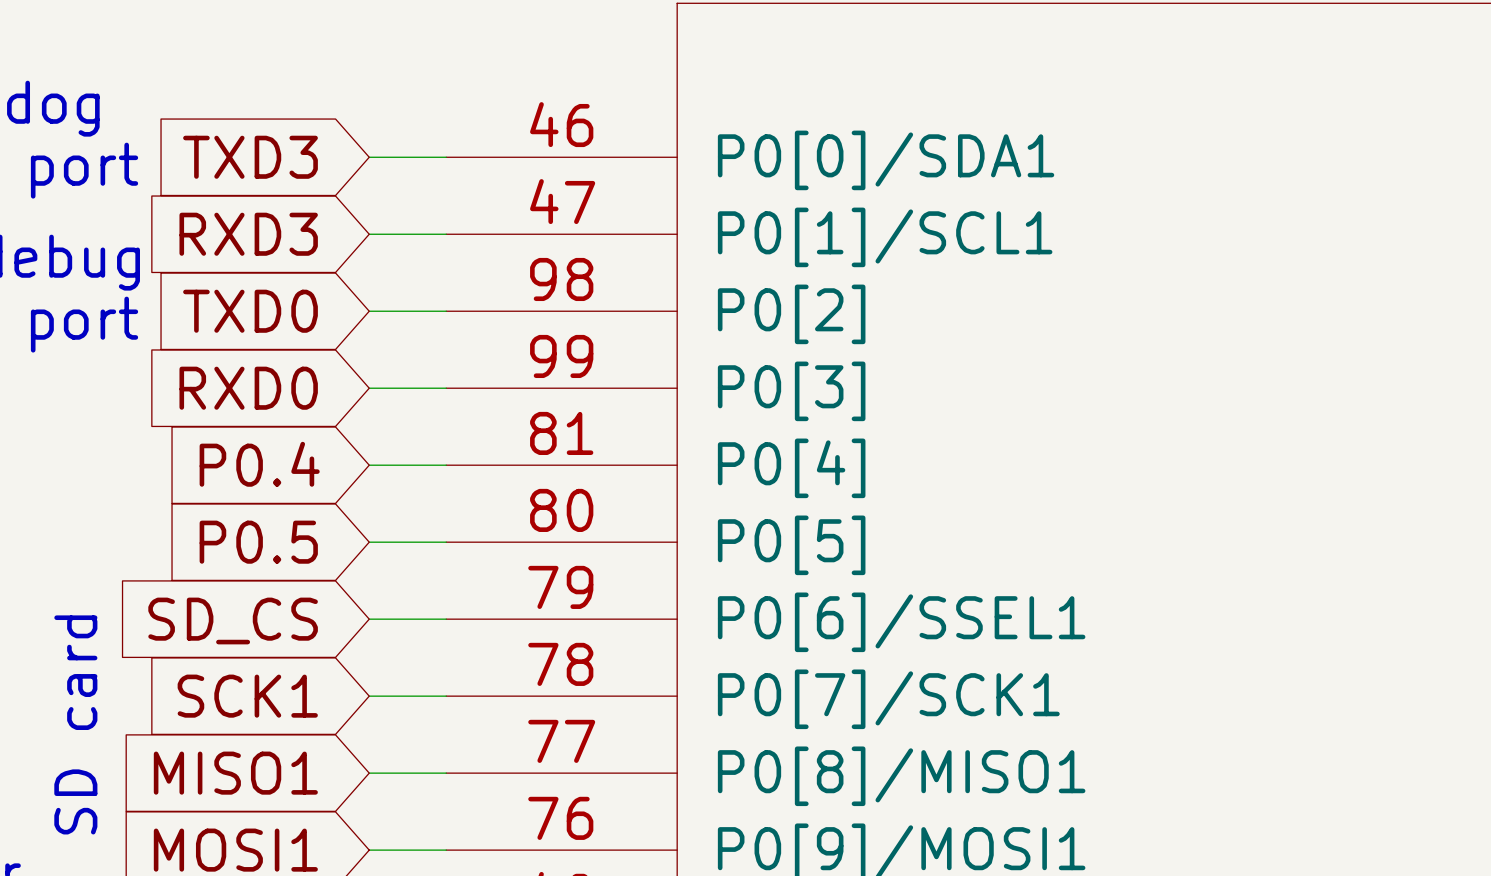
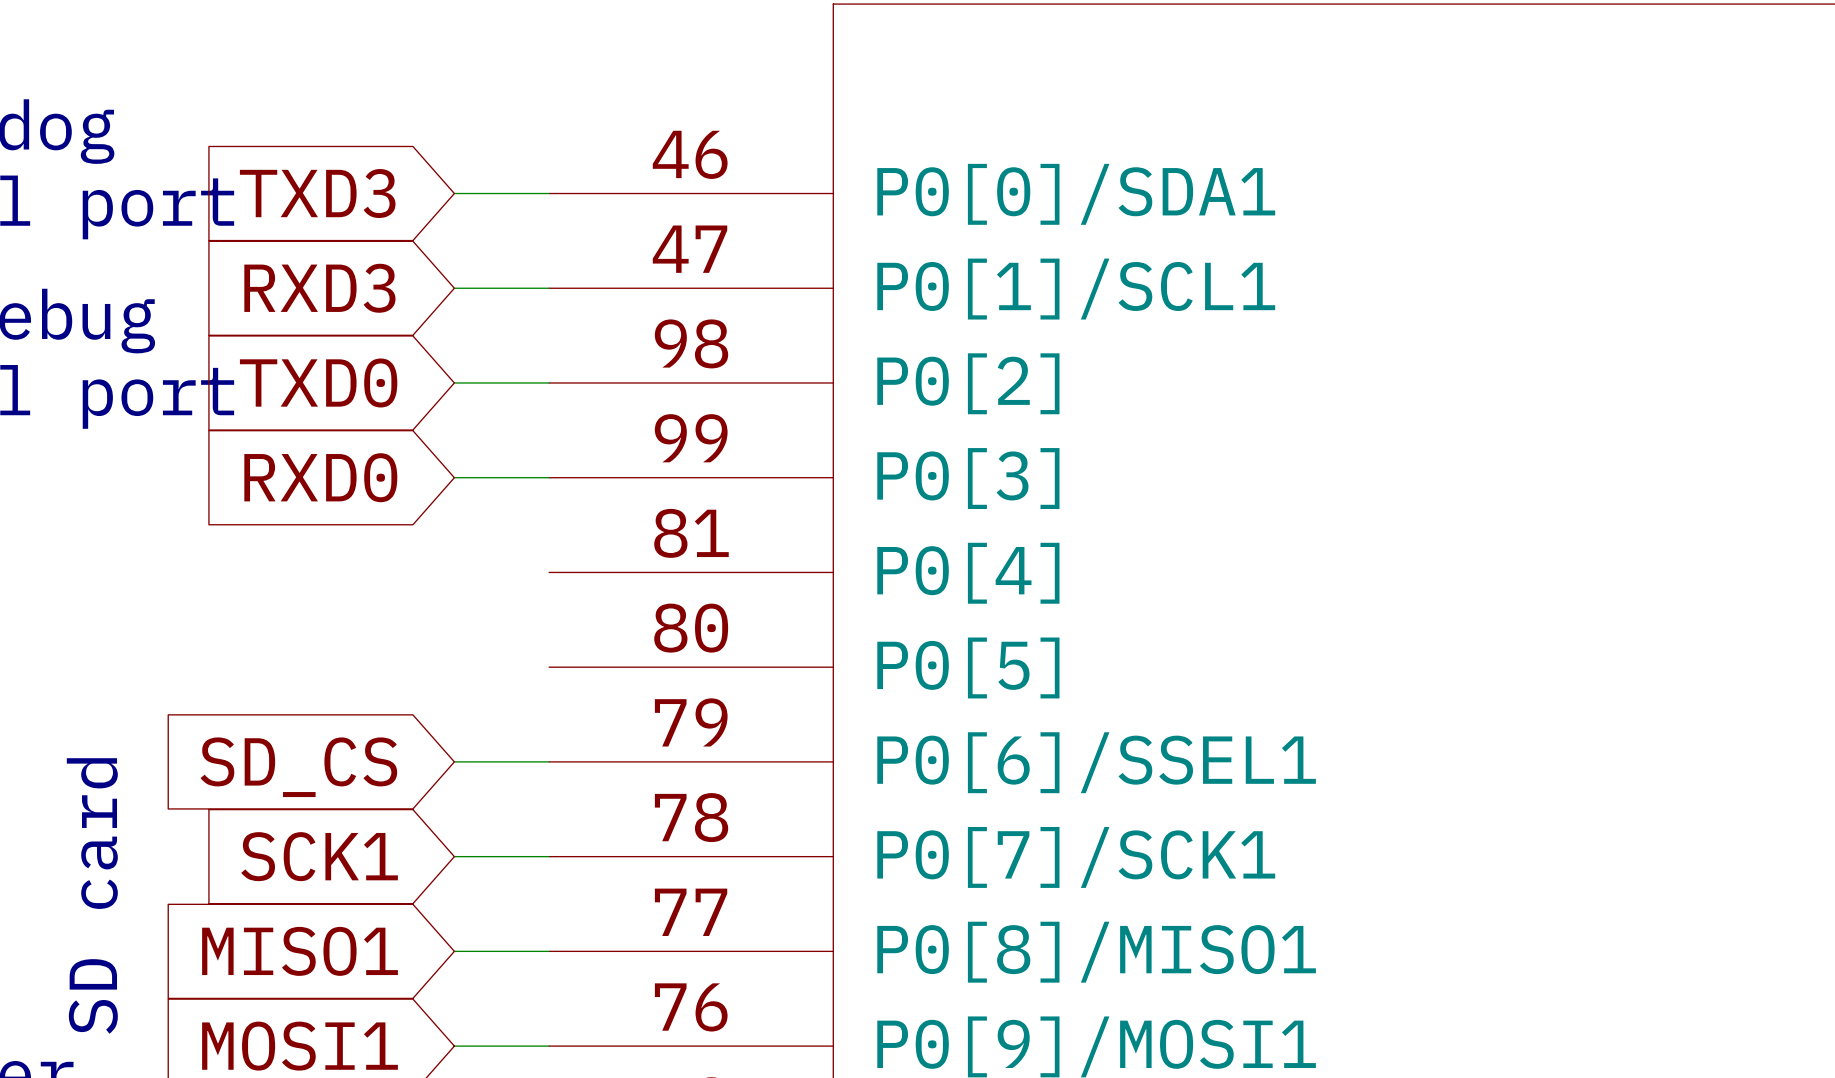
global label: P0.4 (259, 464) -> none
wire: (369, 465) (446, 465) -> none
global label: P0.5 (258, 542) -> none
wire: (369, 542) (446, 542) -> none

